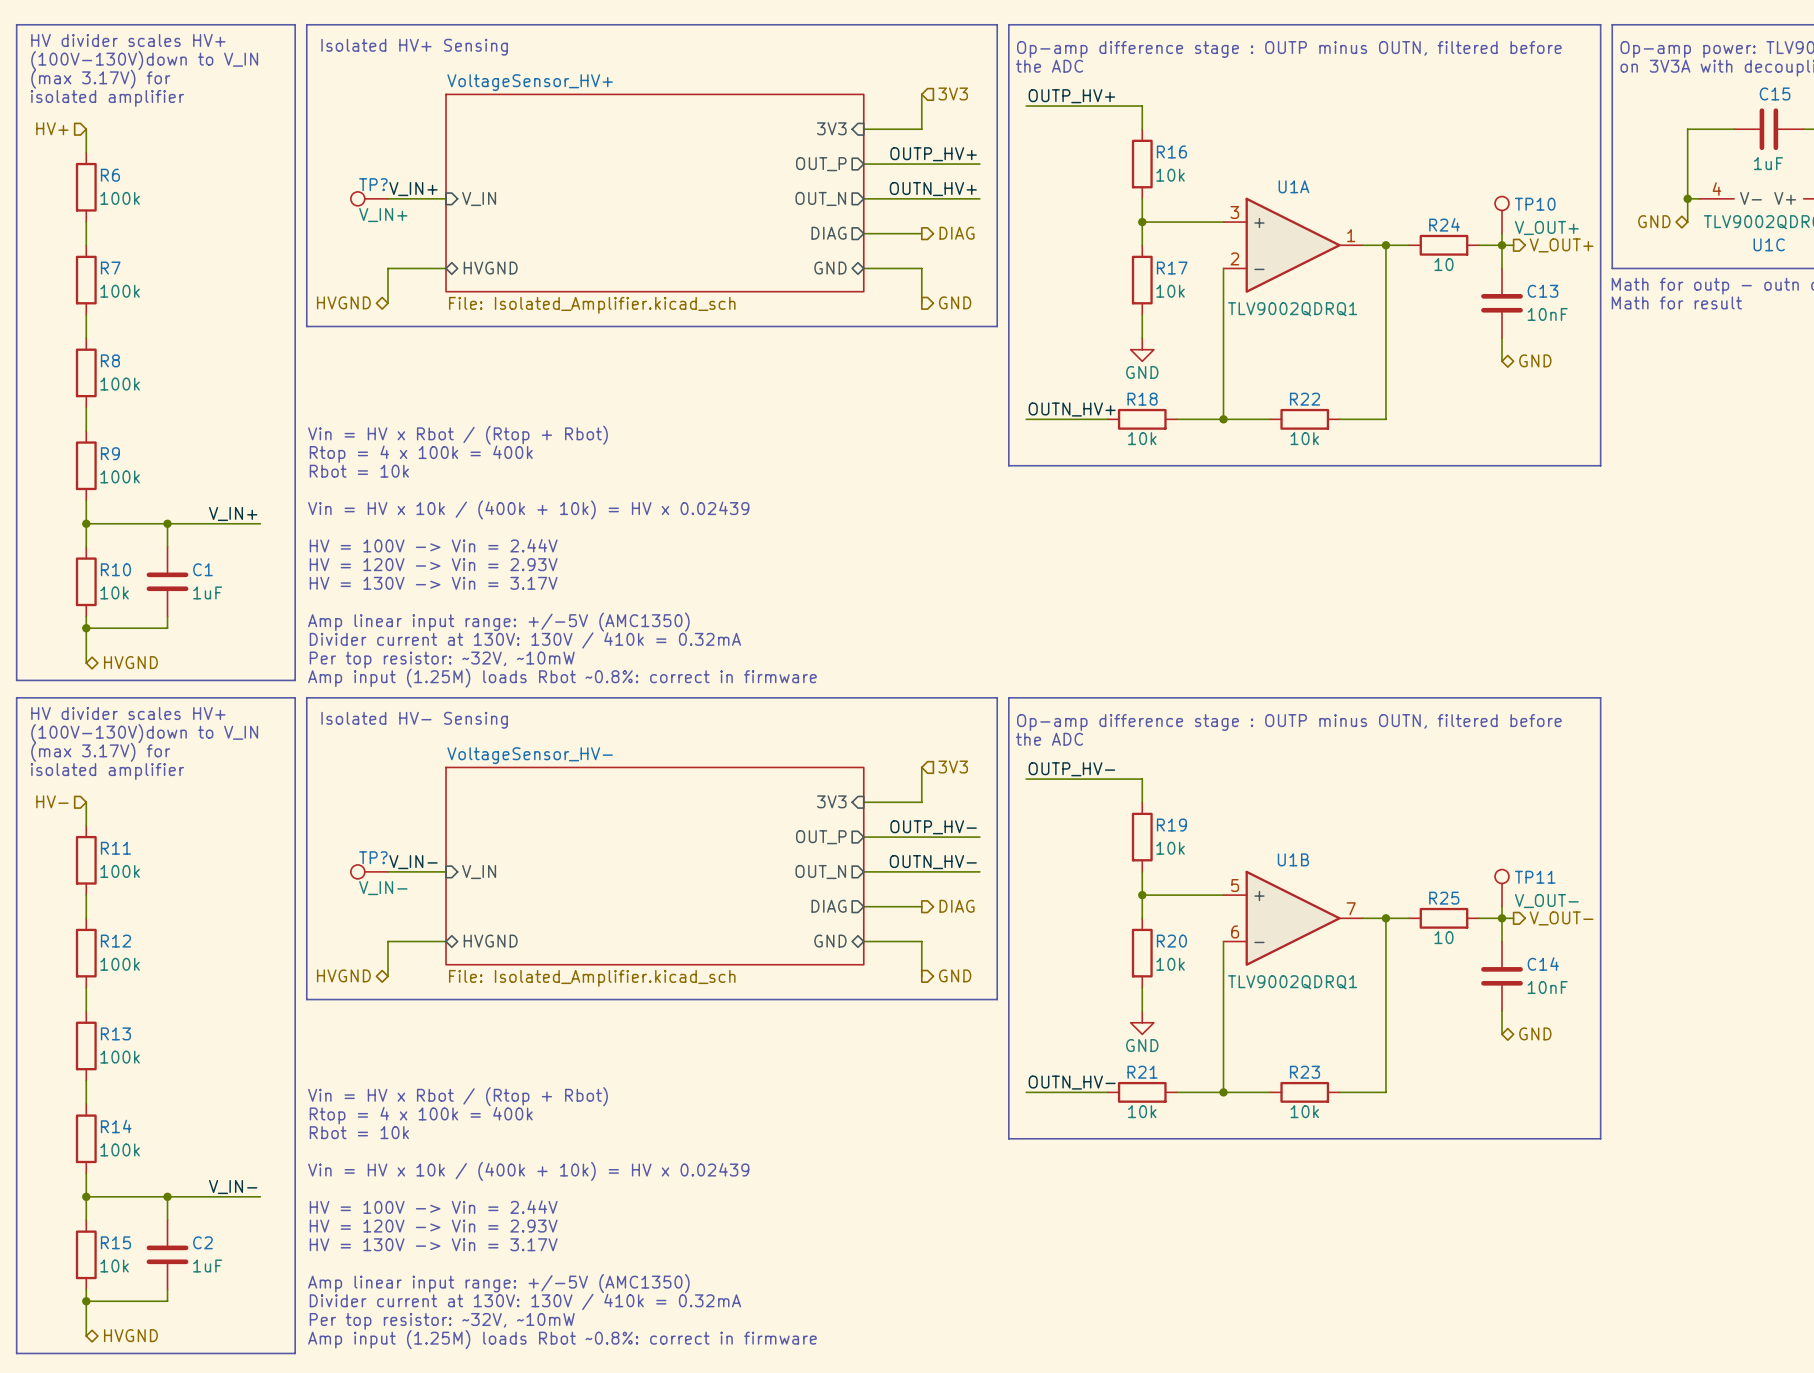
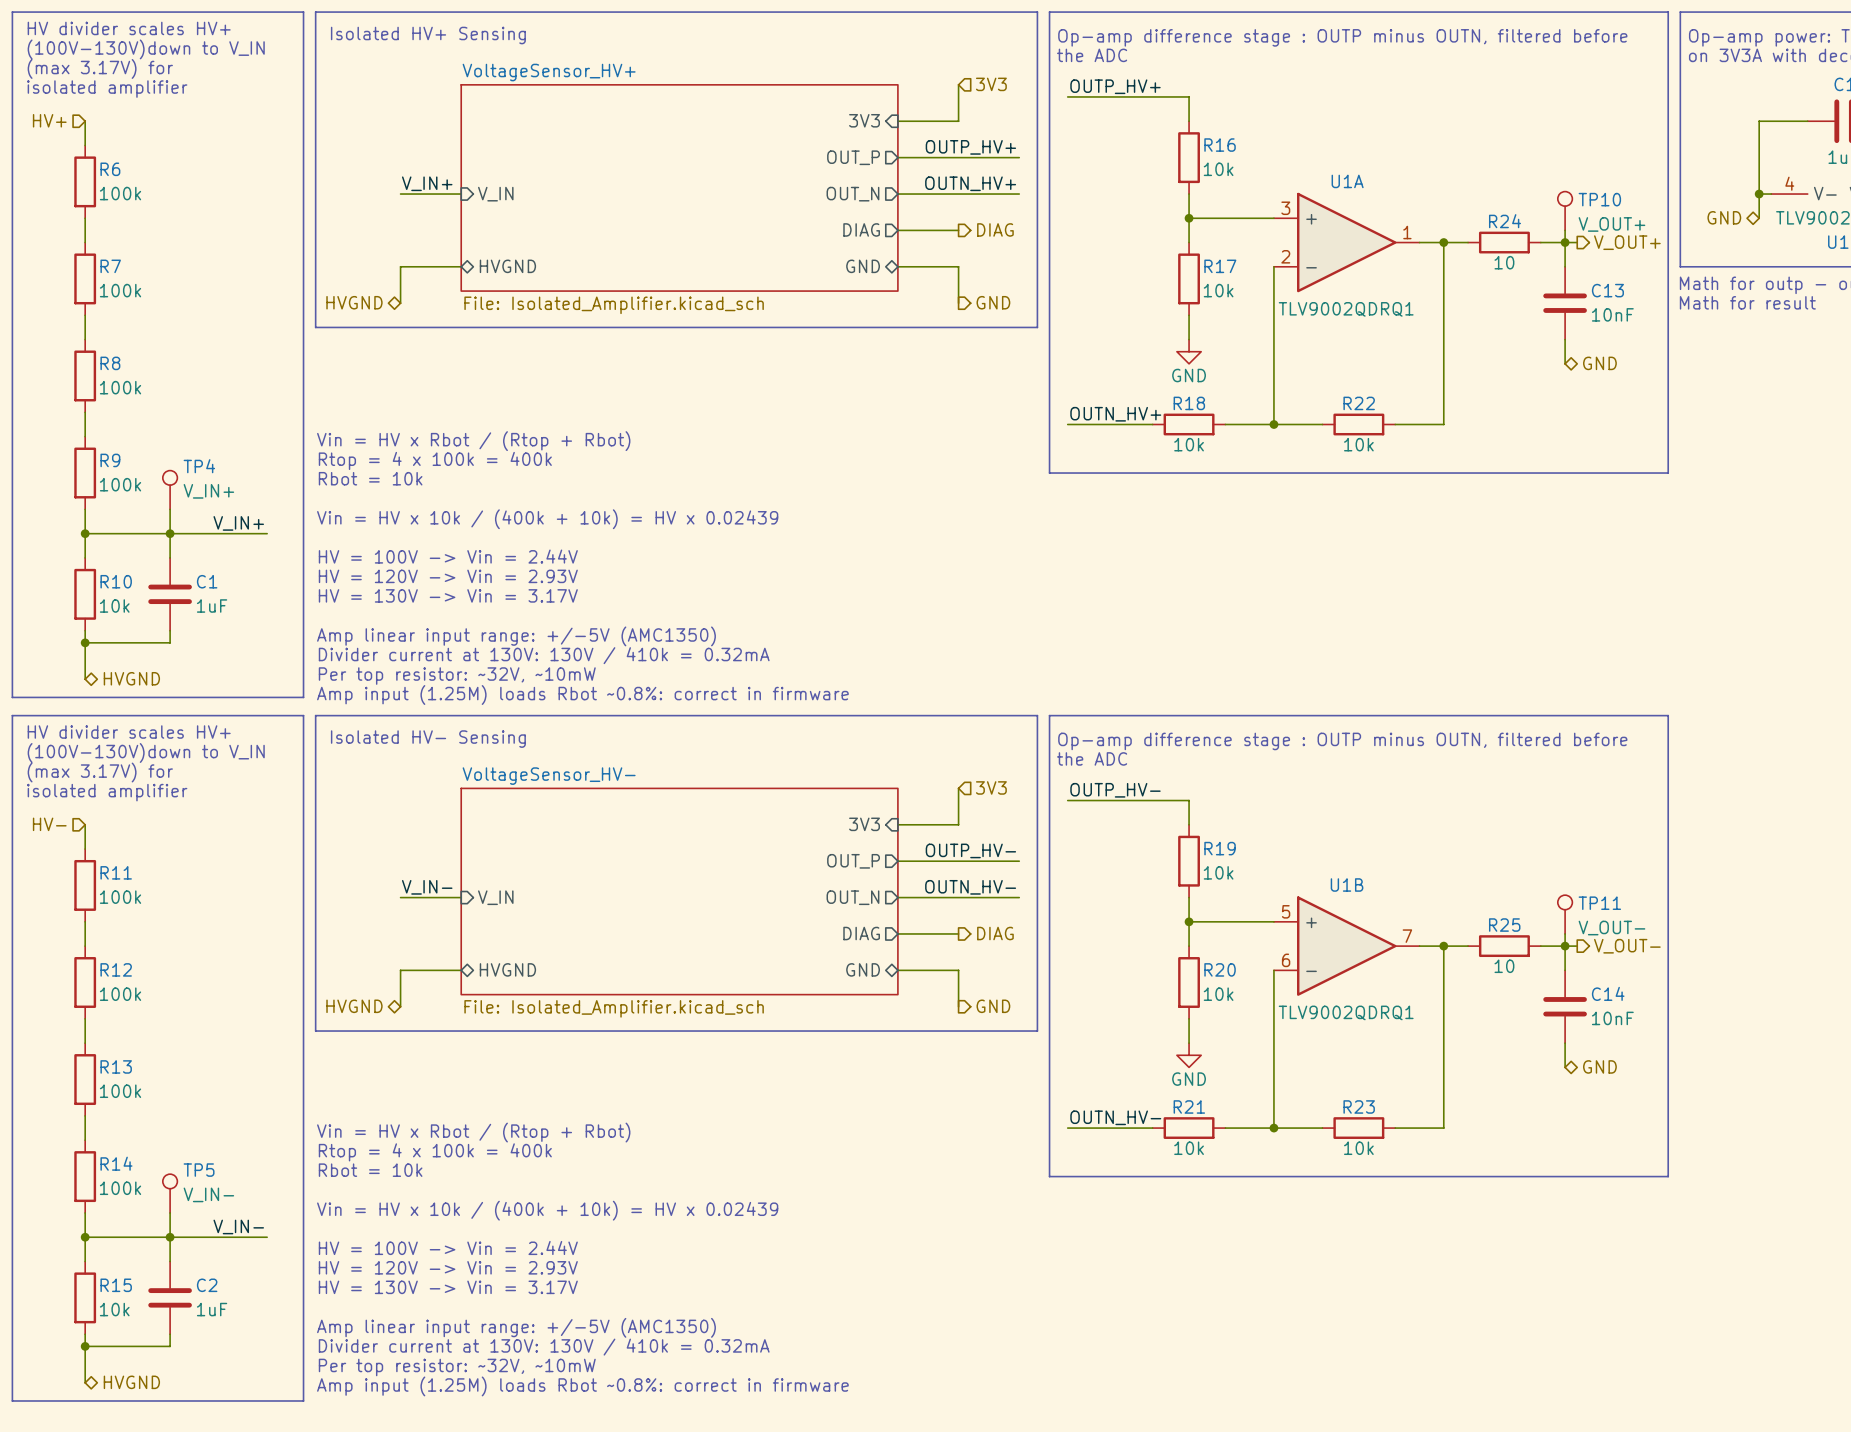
TP?: V_IN+ (369, 198) -> none
TP4: none -> V_IN+ (170, 490)
wire: none -> (170, 509) (170, 533)
TP?: V_IN- (369, 871) -> none
TP5: none -> V_IN- (170, 1193)
wire: none -> (170, 1212) (170, 1237)

